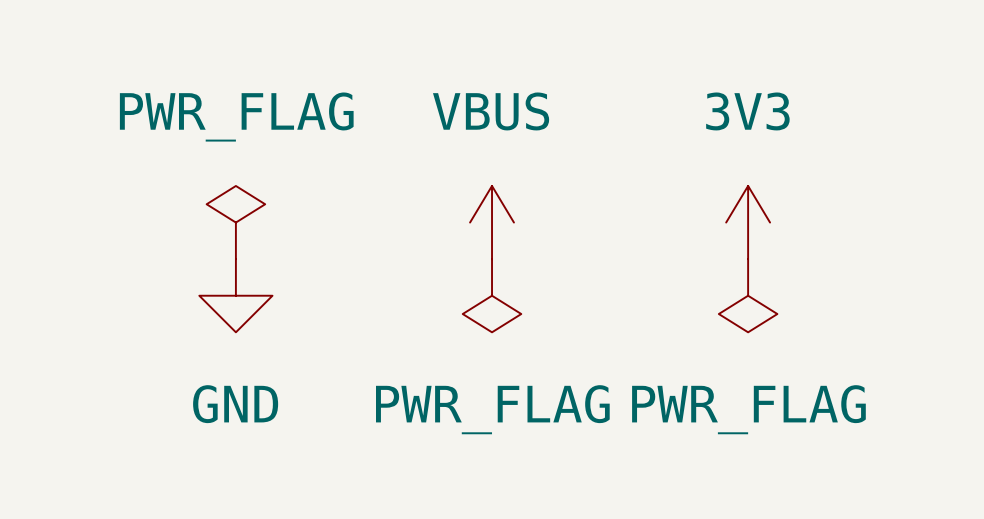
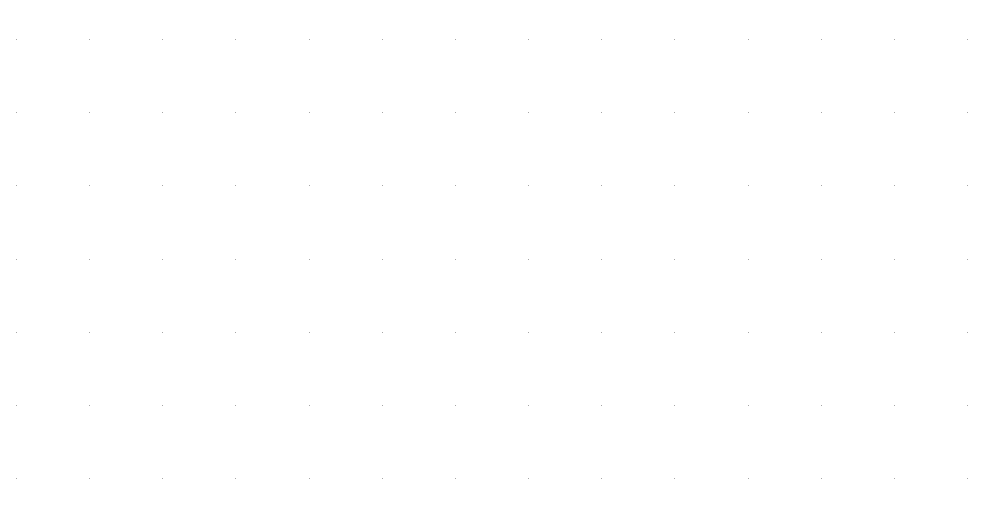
power symbol: PWR_FLAG (235, 222) -> none
power symbol: VBUS (492, 222) -> none
power symbol: 3V3 (748, 222) -> none
power symbol: GND (235, 295) -> none
power symbol: PWR_FLAG (492, 295) -> none
power symbol: PWR_FLAG (748, 295) -> none

